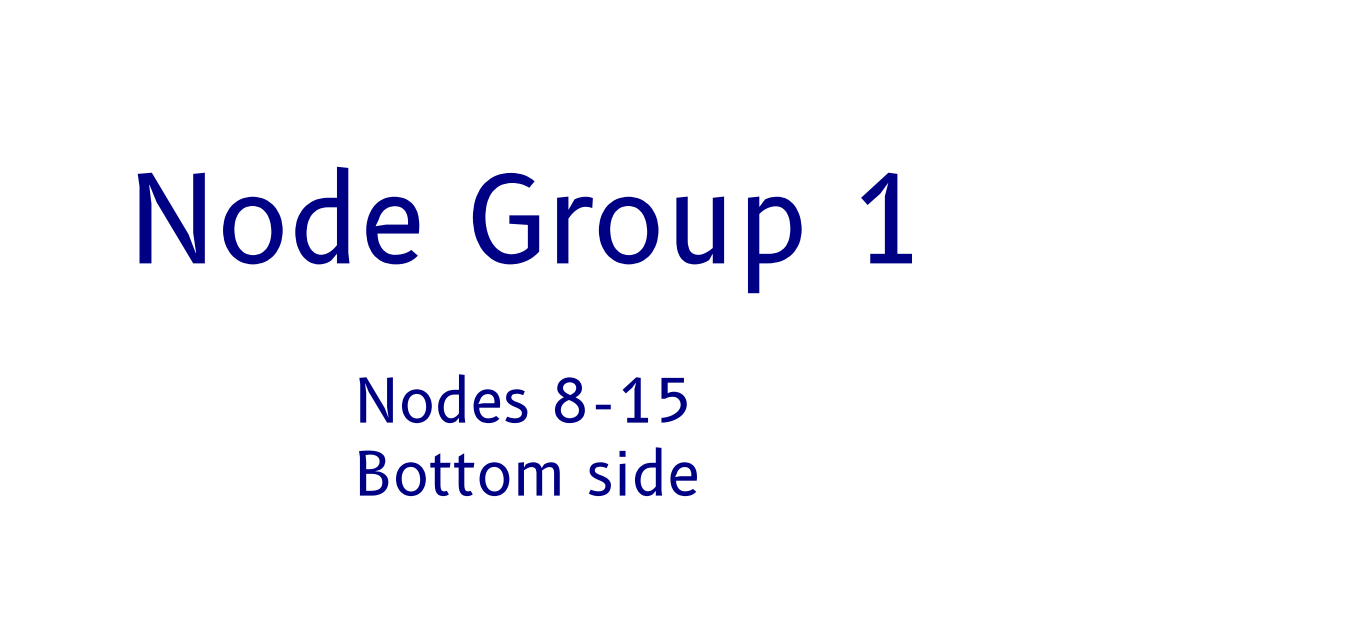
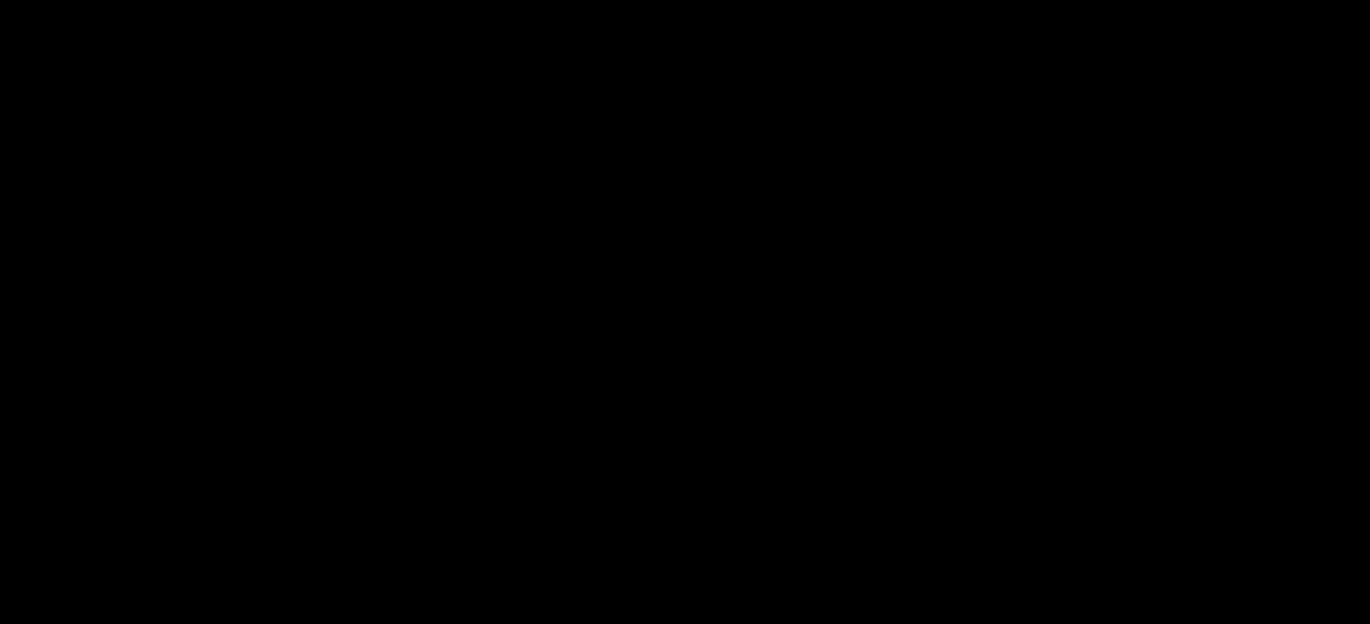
text: Node Group 1 (524, 229) -> none
text: Nodes 8-15 (523, 398) -> none
text: Bottom side (528, 471) -> none

